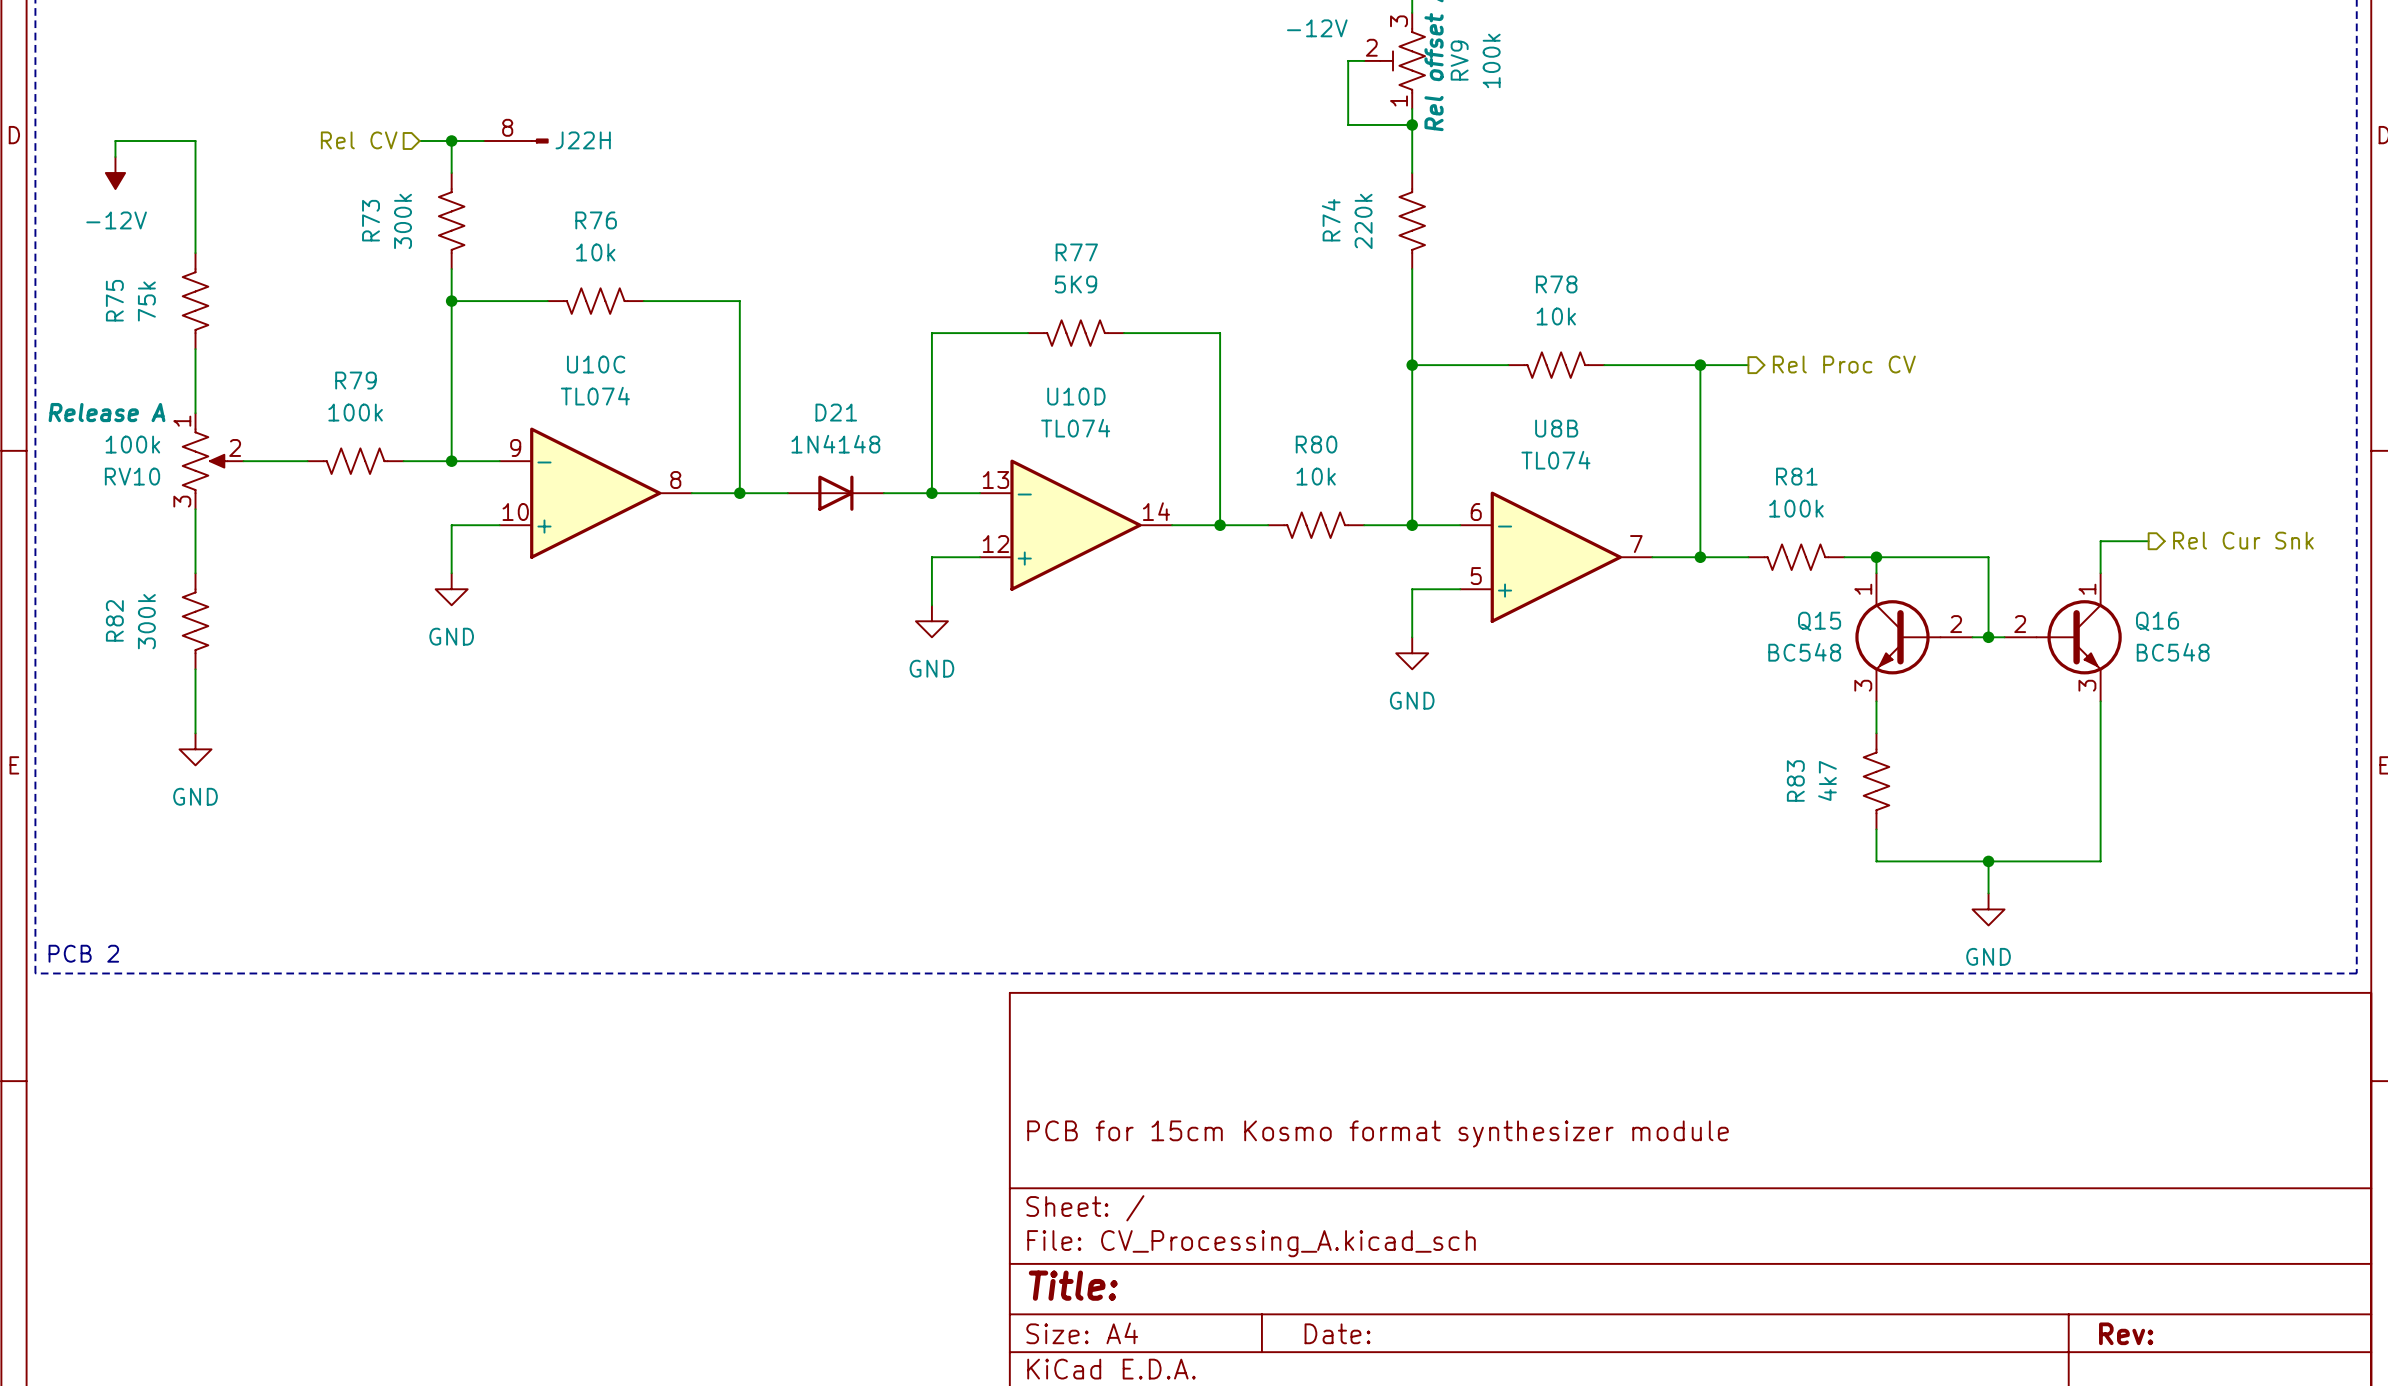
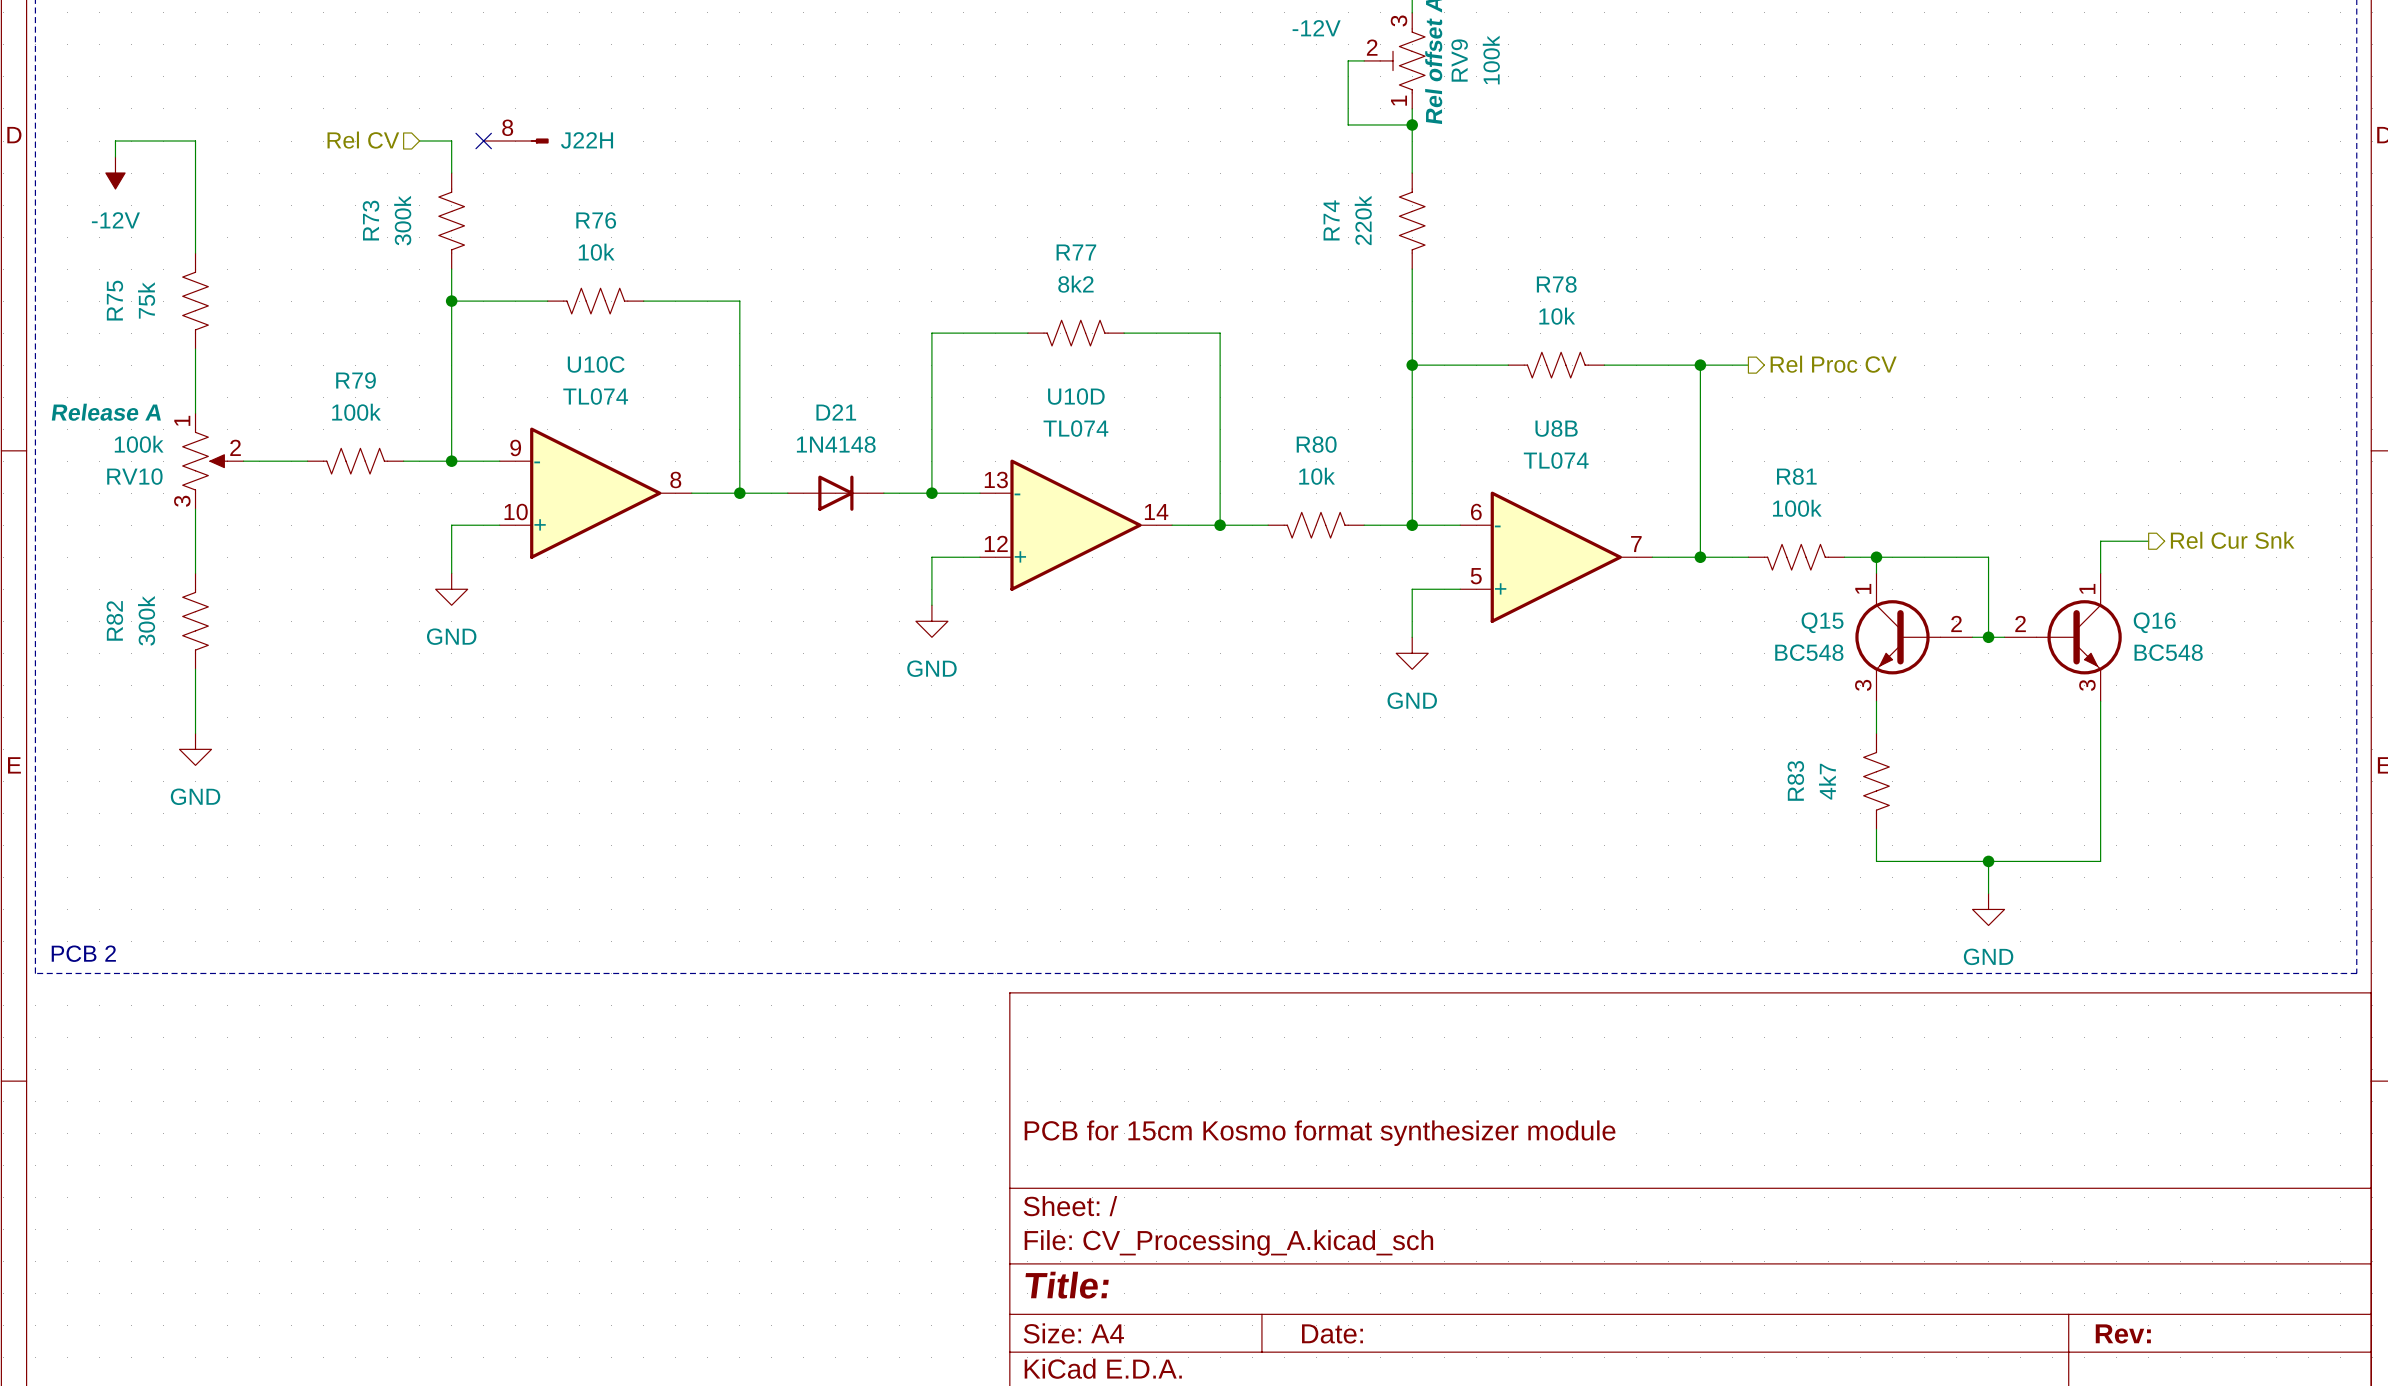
wire: (451, 141) (483, 141) -> none
junction: (451, 141) -> none
no-connect mark: none -> (483, 141)
R77 value: 5K9 (1076, 284) -> 8k2 (1075, 284)

